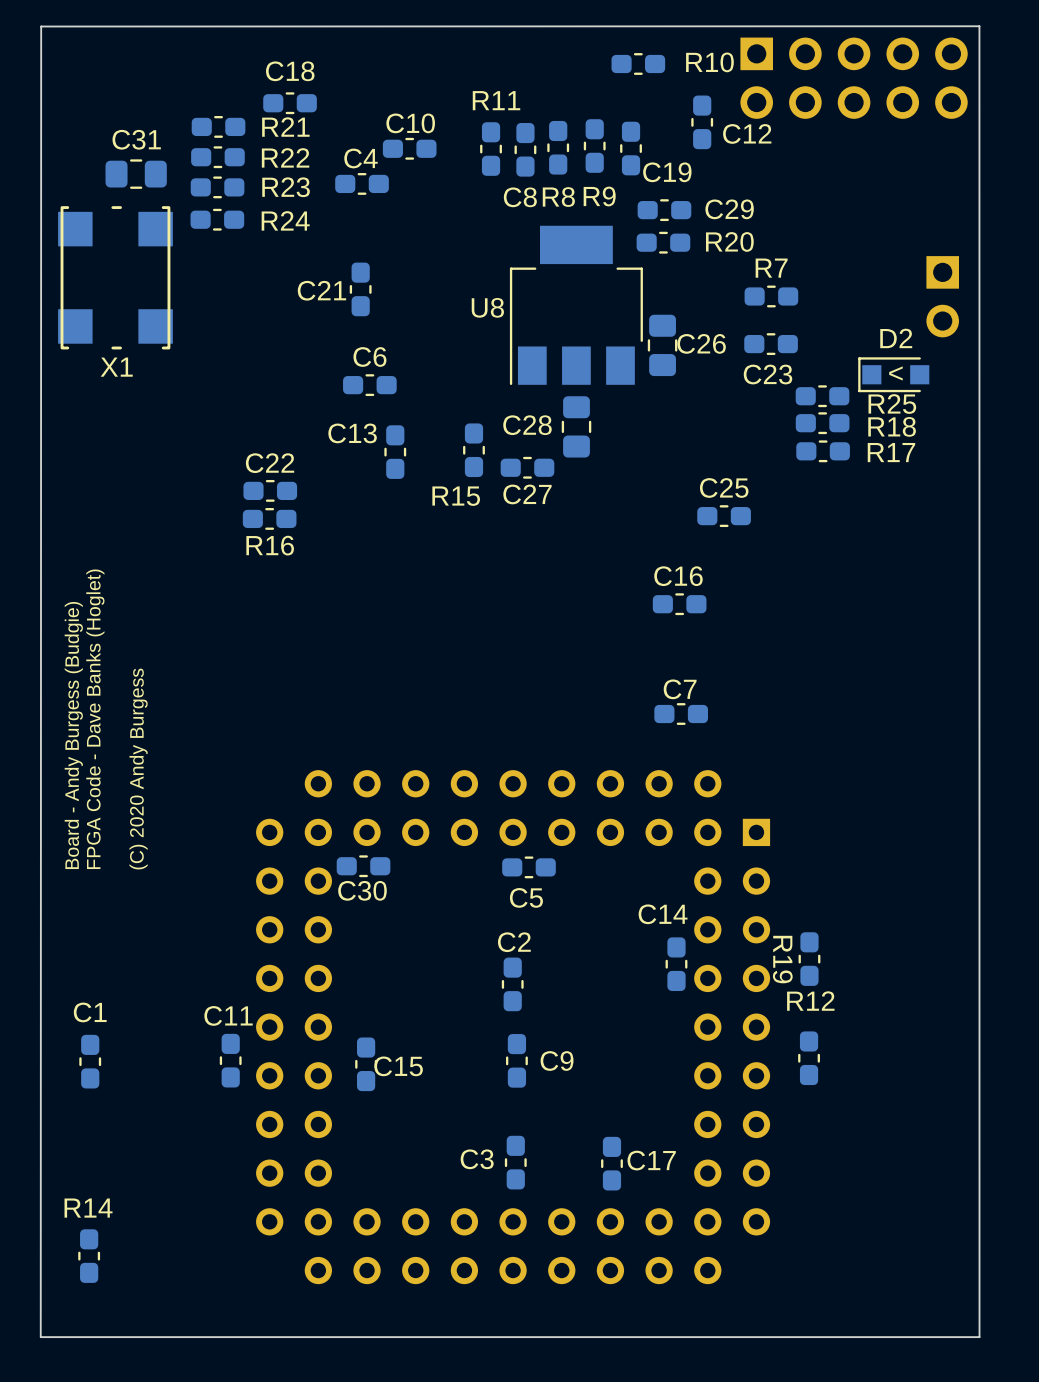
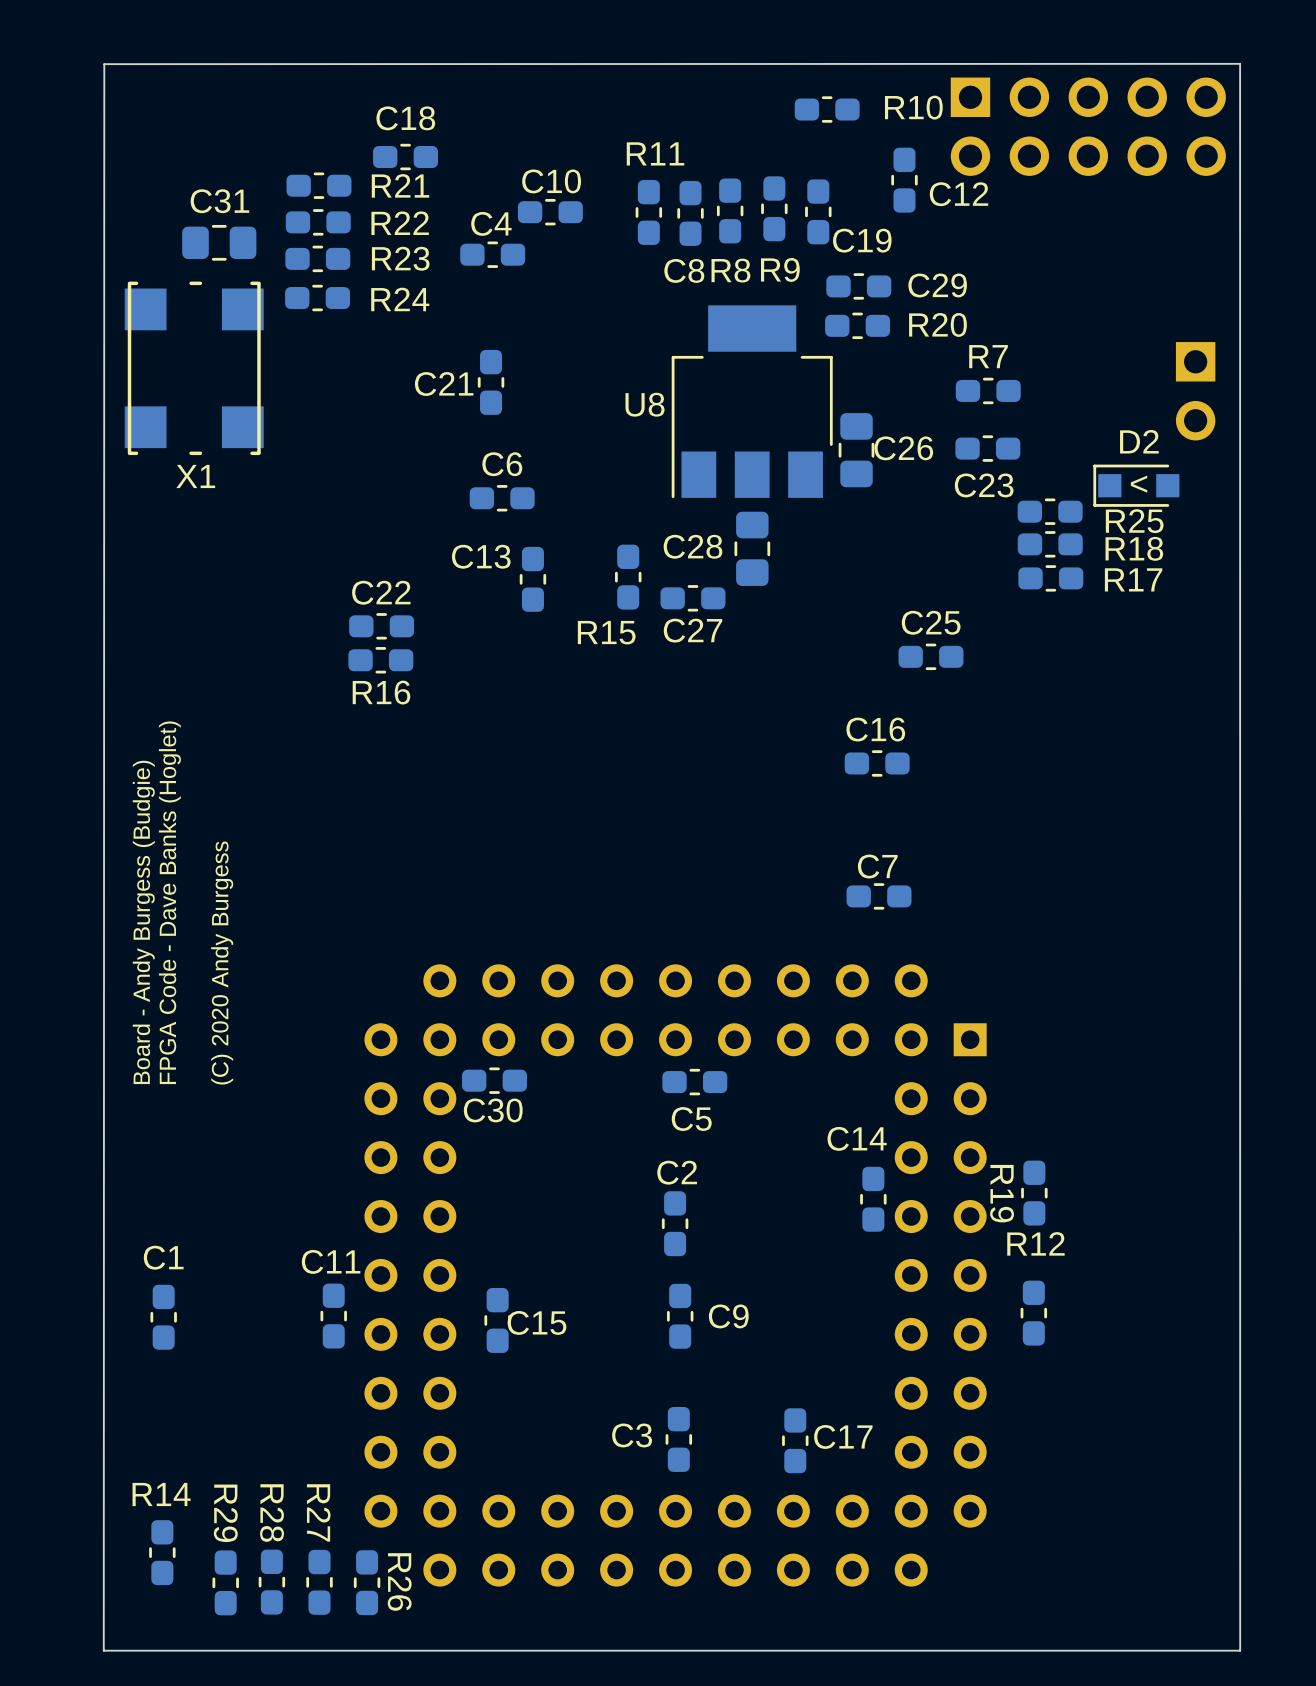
R28: none -> (271, 1582)
R27: none -> (319, 1582)
R26: none -> (367, 1582)
R29: none -> (225, 1582)

